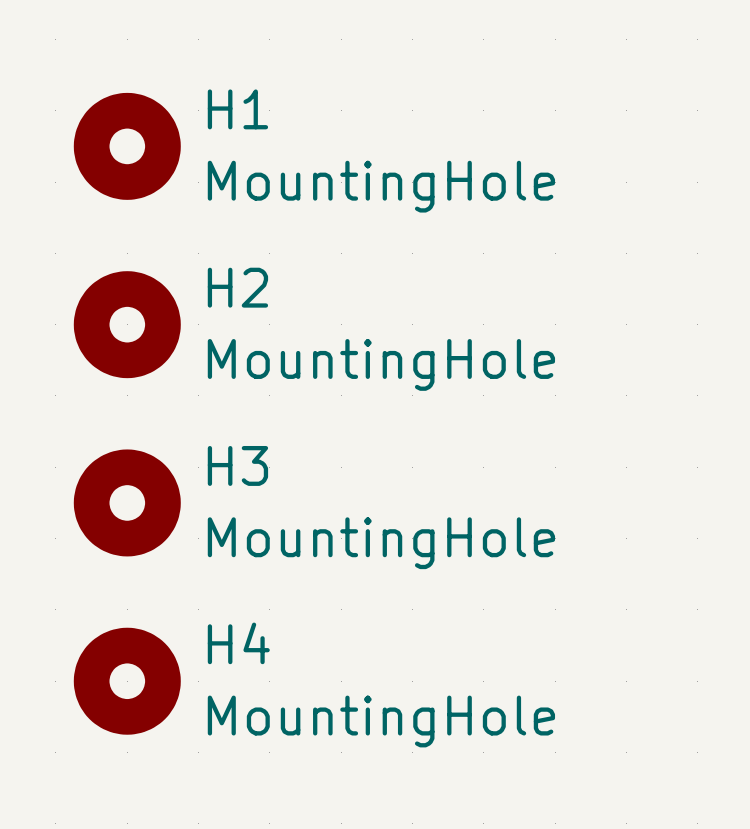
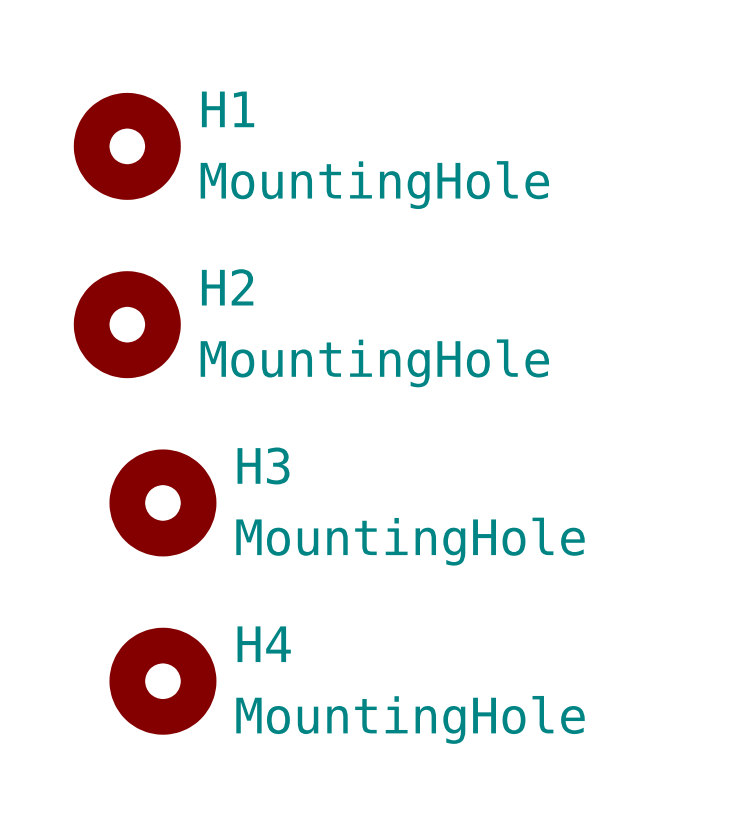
H3 position: (127, 502) -> (162, 502)
H4 position: (127, 681) -> (162, 681)

